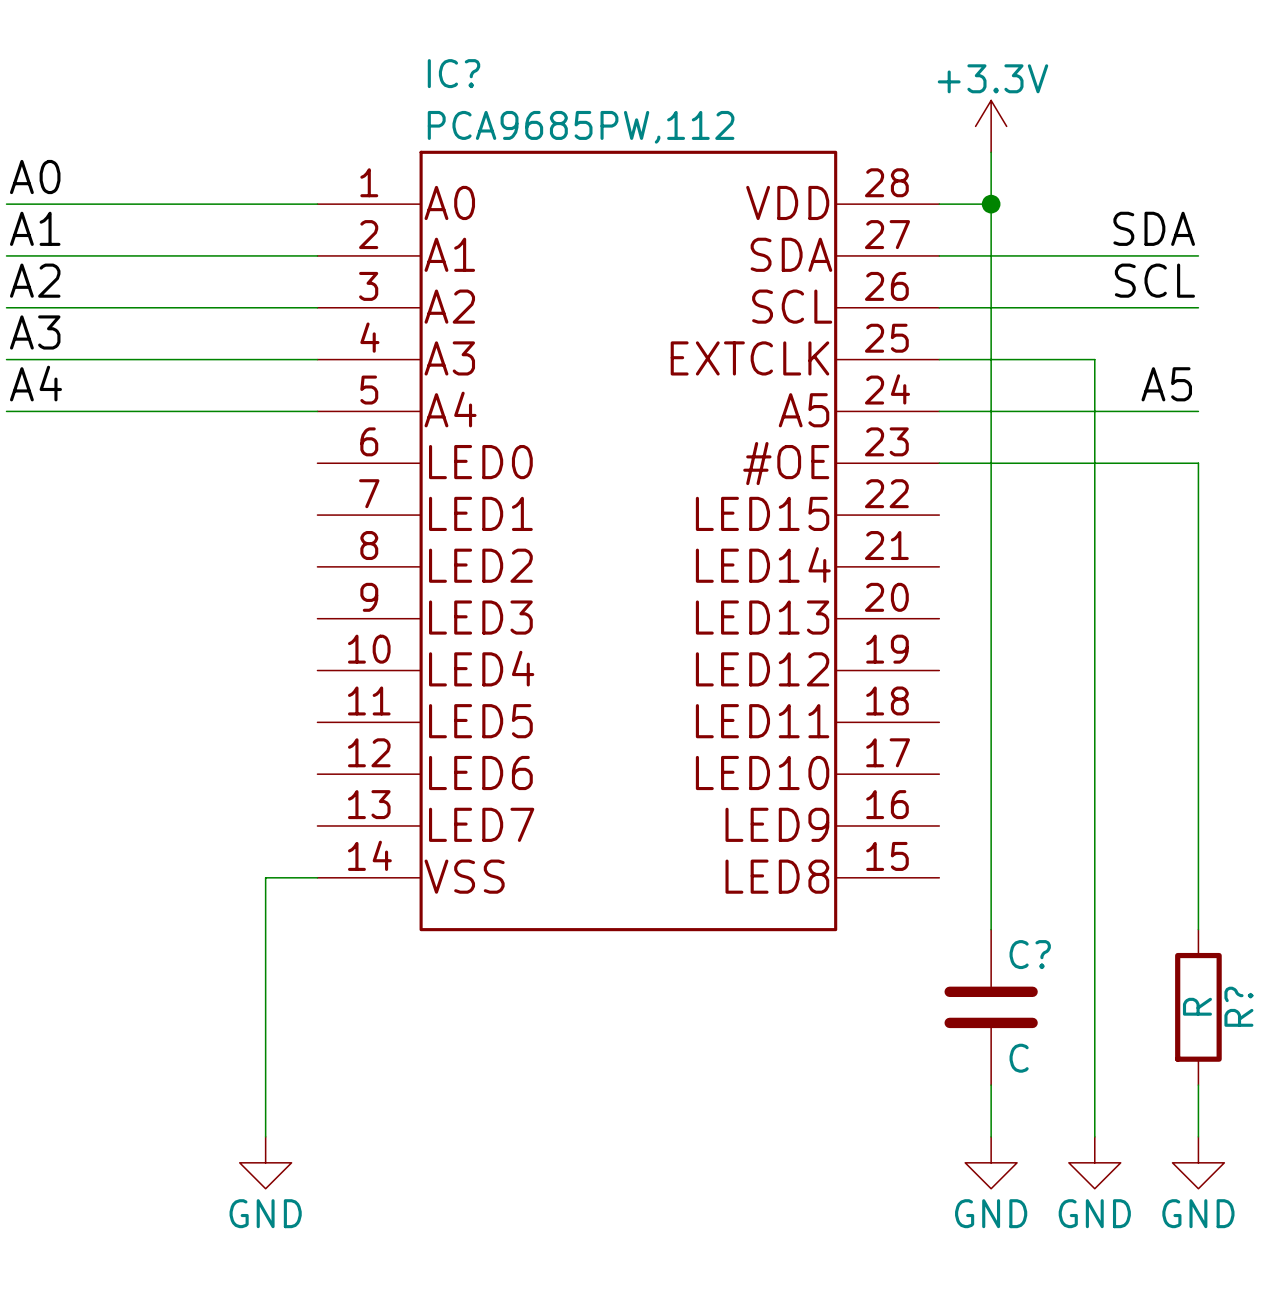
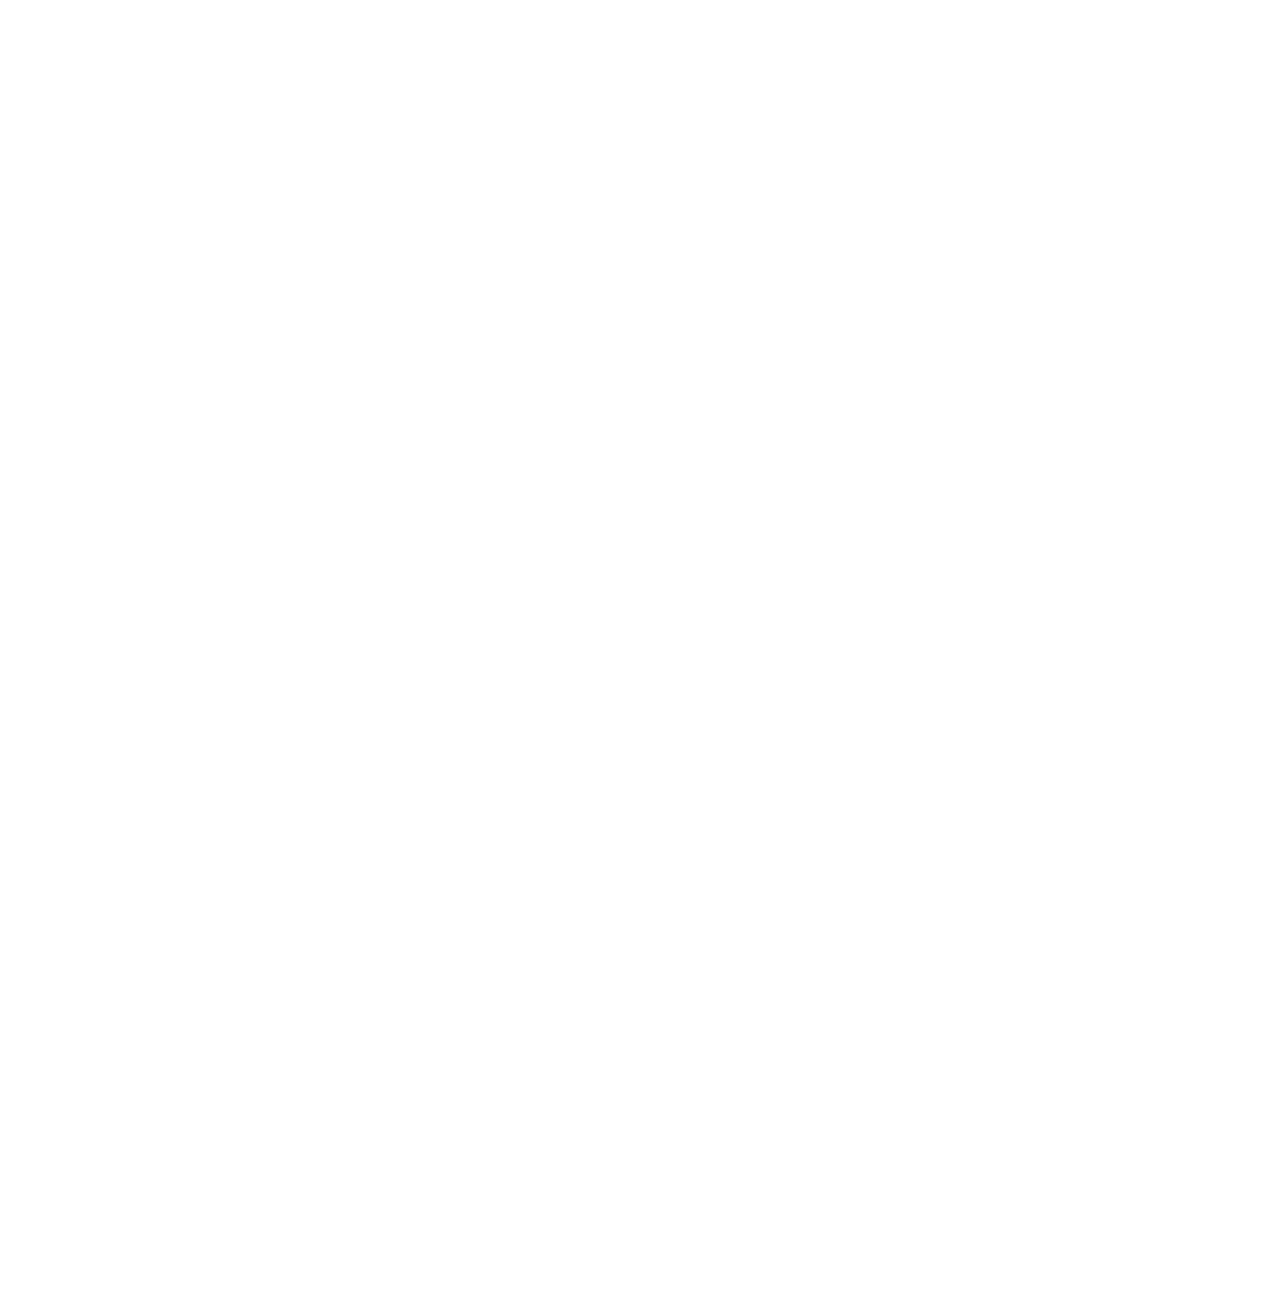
power symbol: +3.3V (991, 126) -> none
wire: (991, 152) (991, 929) -> none
label: A0 (35, 177) -> none
wire: (6, 204) (317, 204) -> none
wire: (939, 204) (991, 204) -> none
junction: (991, 204) -> none
label: A1 (35, 228) -> none
label: SDA (1154, 228) -> none
wire: (6, 255) (317, 255) -> none
wire: (939, 255) (1198, 255) -> none
label: A2 (35, 280) -> none
label: SCL (1154, 280) -> none
wire: (6, 307) (317, 307) -> none
wire: (939, 307) (1198, 307) -> none
label: A3 (35, 332) -> none
wire: (6, 359) (317, 359) -> none
wire: (939, 359) (1094, 359) (1094, 1136) -> none
label: A4 (35, 383) -> none
label: A5 (1166, 384) -> none
wire: (6, 411) (317, 411) -> none
wire: (939, 411) (1198, 411) -> none
wire: (939, 463) (1198, 463) (1198, 929) -> none
IC?: PCA9685PW,112 (628, 540) -> none
wire: (317, 877) (265, 877) (265, 1136) -> none
C?: C (991, 1007) -> none
R?: R (1198, 1007) -> none
wire: (991, 1085) (991, 1136) -> none
wire: (1198, 1085) (1198, 1136) -> none
power symbol: GND (265, 1162) -> none
power symbol: GND (991, 1162) -> none
power symbol: GND (1094, 1162) -> none
power symbol: GND (1198, 1162) -> none

